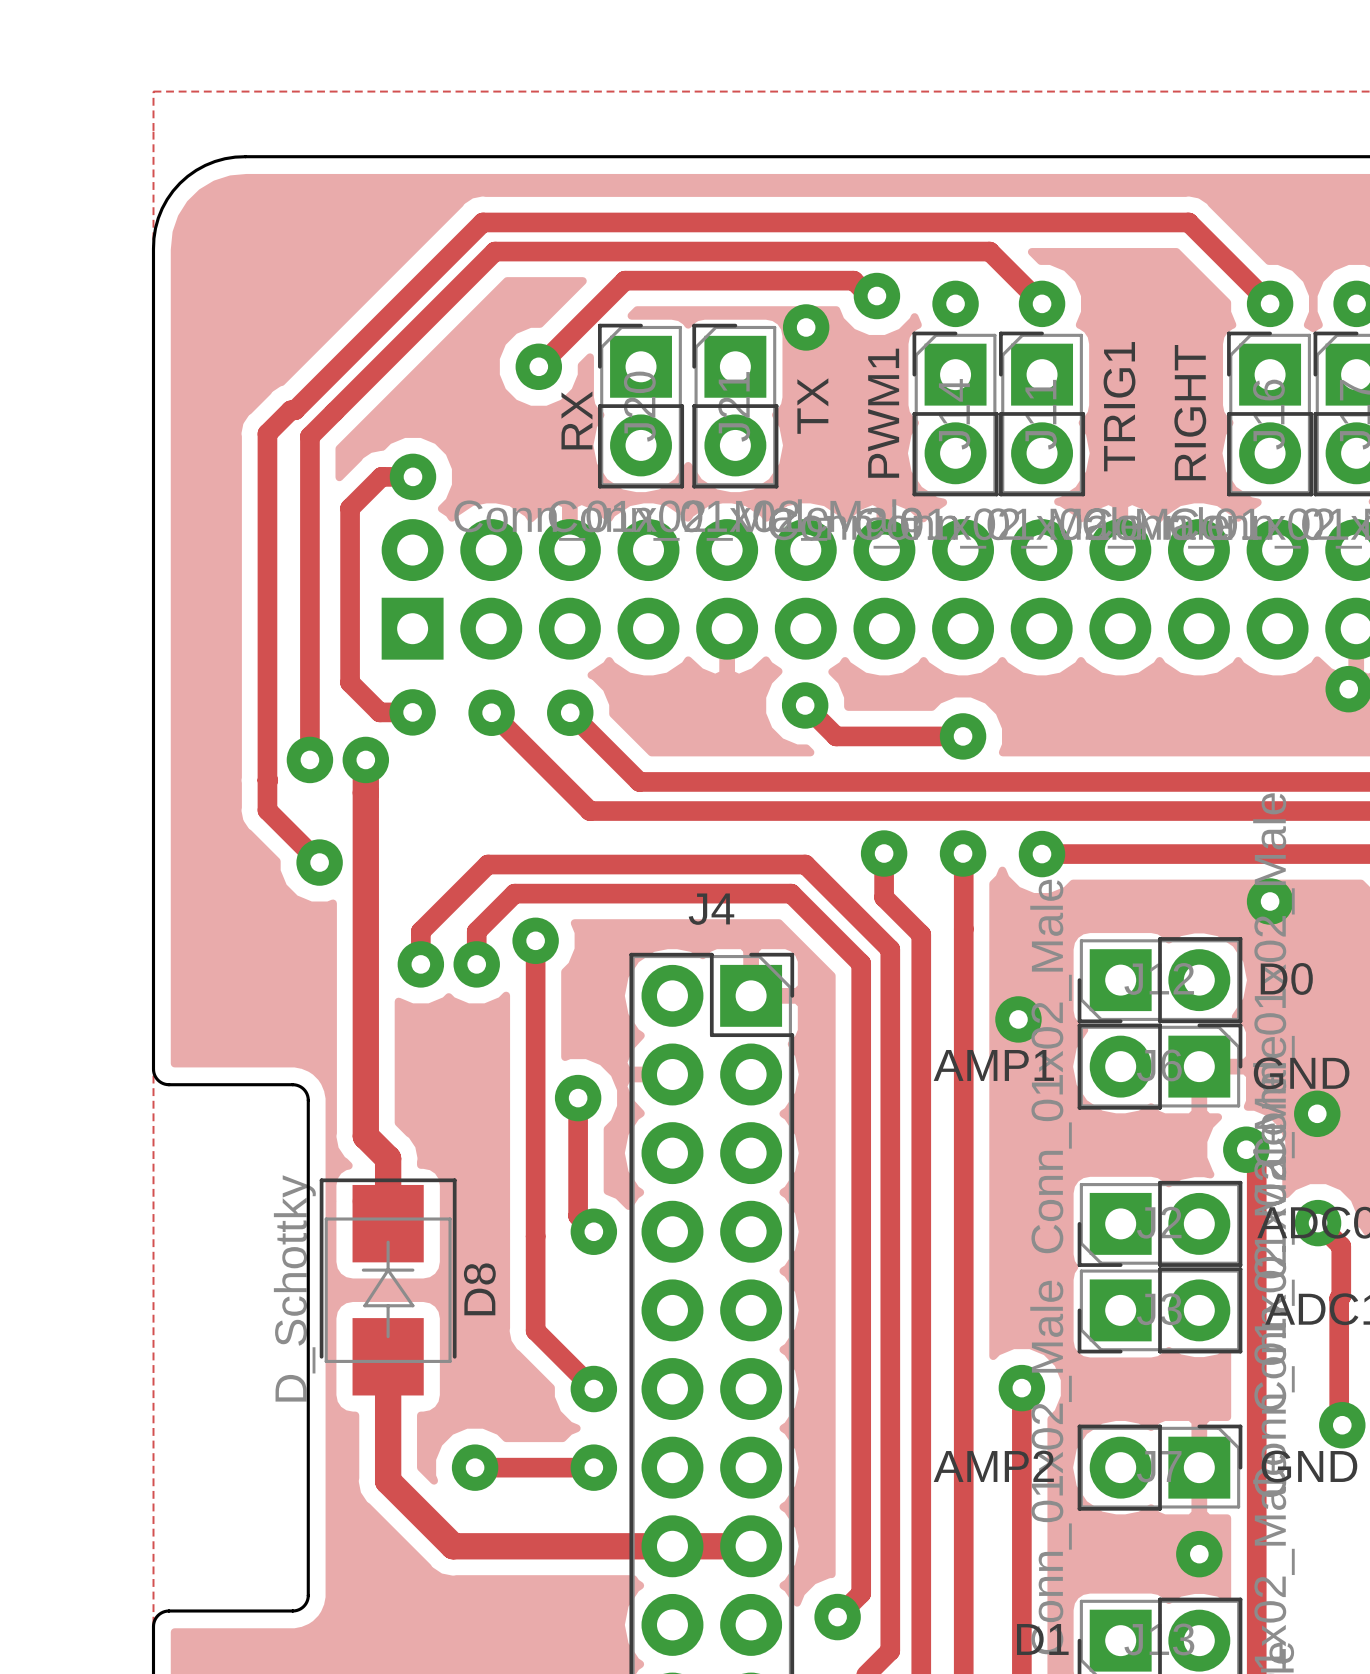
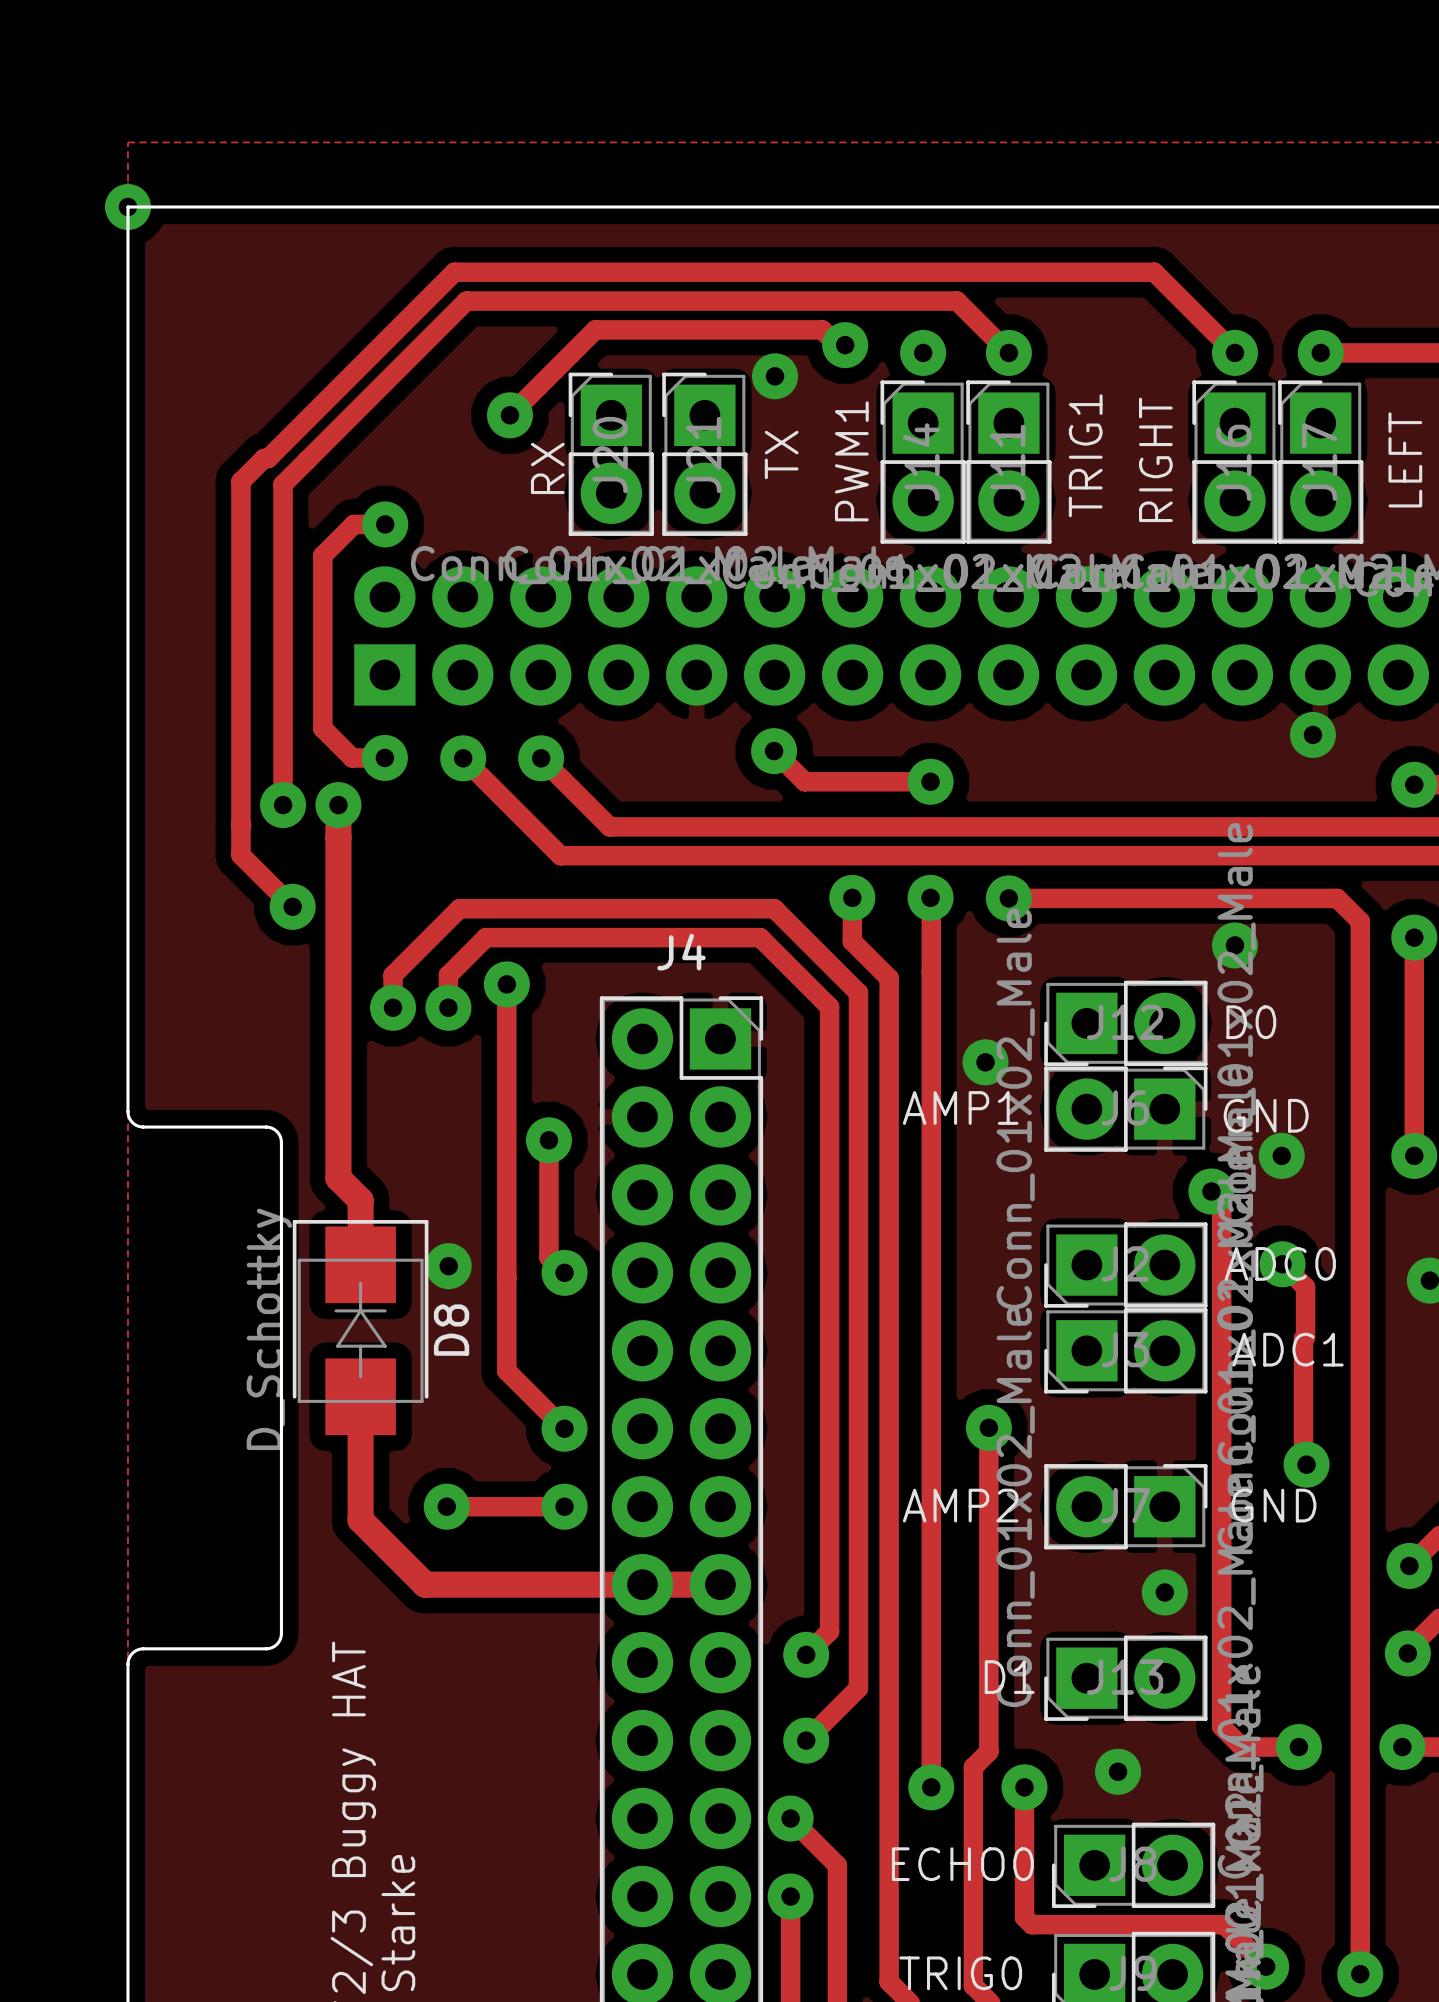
via: none -> (127, 207)
board edge: (245, 156) (214, 161) (196, 170) (180, 183) (162, 208) (155, 228) (153, 248) -> (219, 207) (127, 207) (127, 298)
via: none -> (448, 1266)

